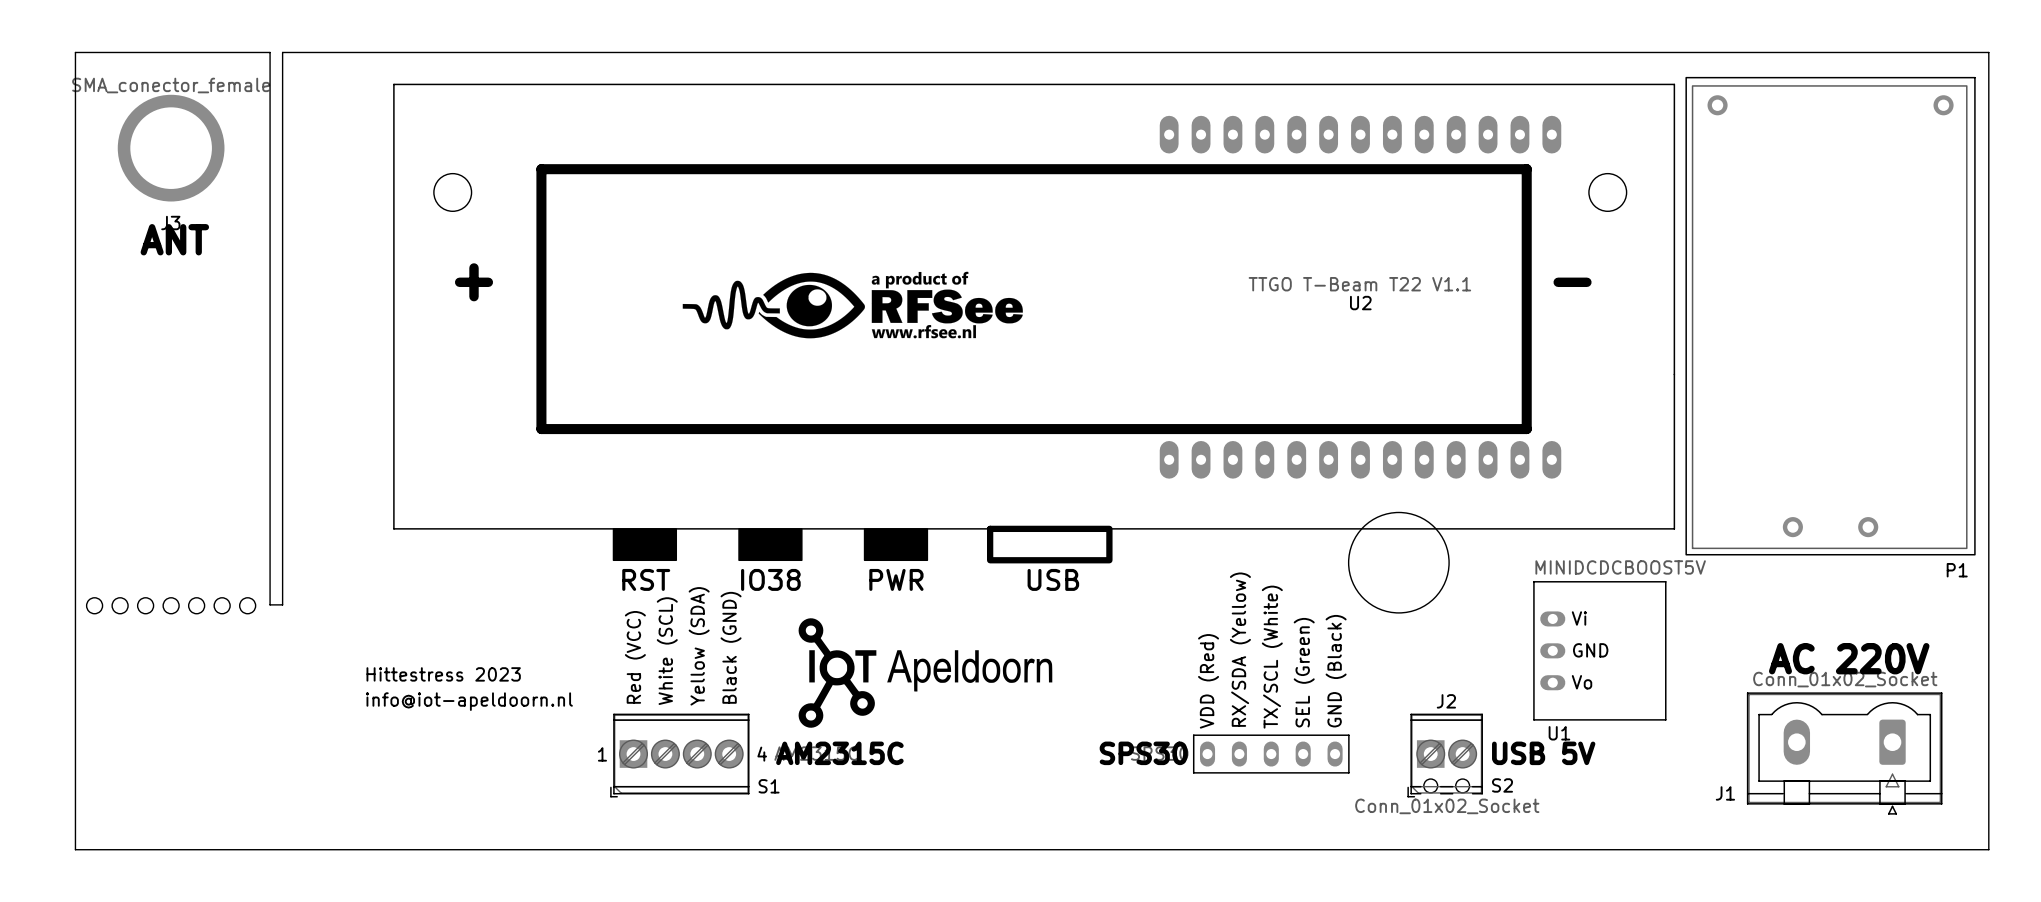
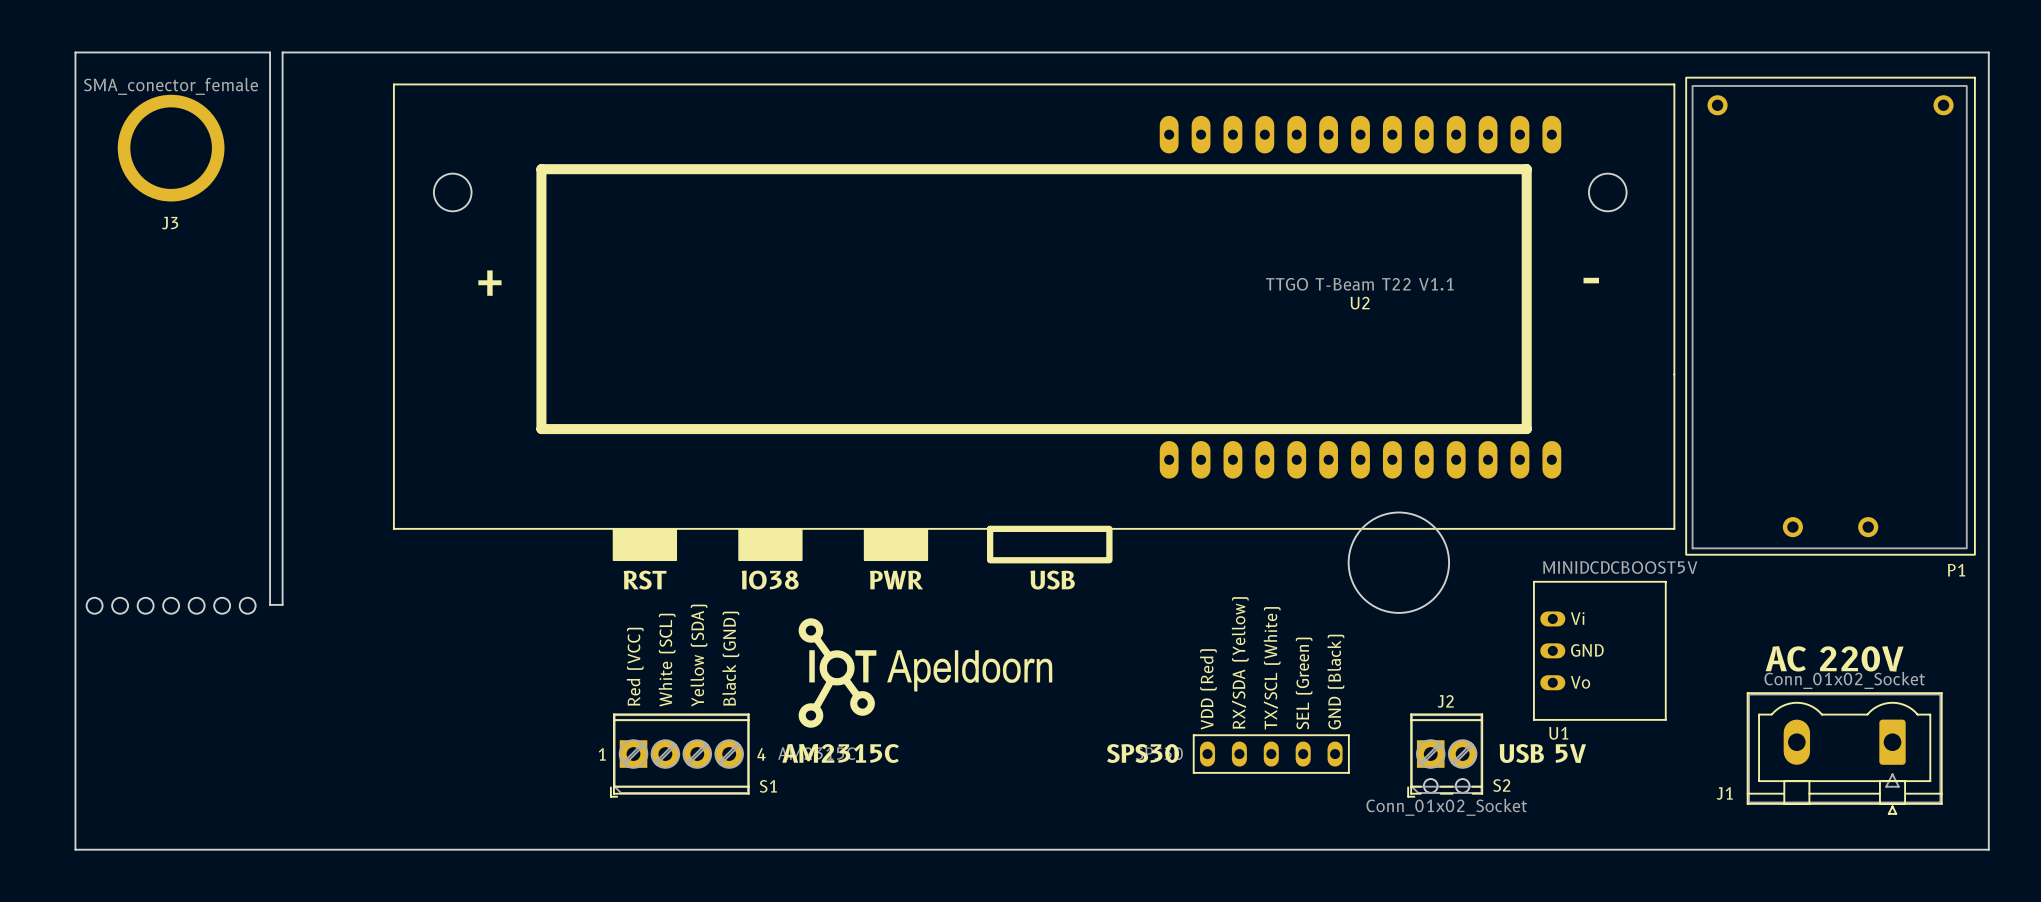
text: ANT (174, 239) -> none
drawing: [682, 271, 1023, 339] -> none
text: Hittestress 2023 (443, 674) -> none
text: info@iot-apeldoorn.nl (469, 701) -> none

